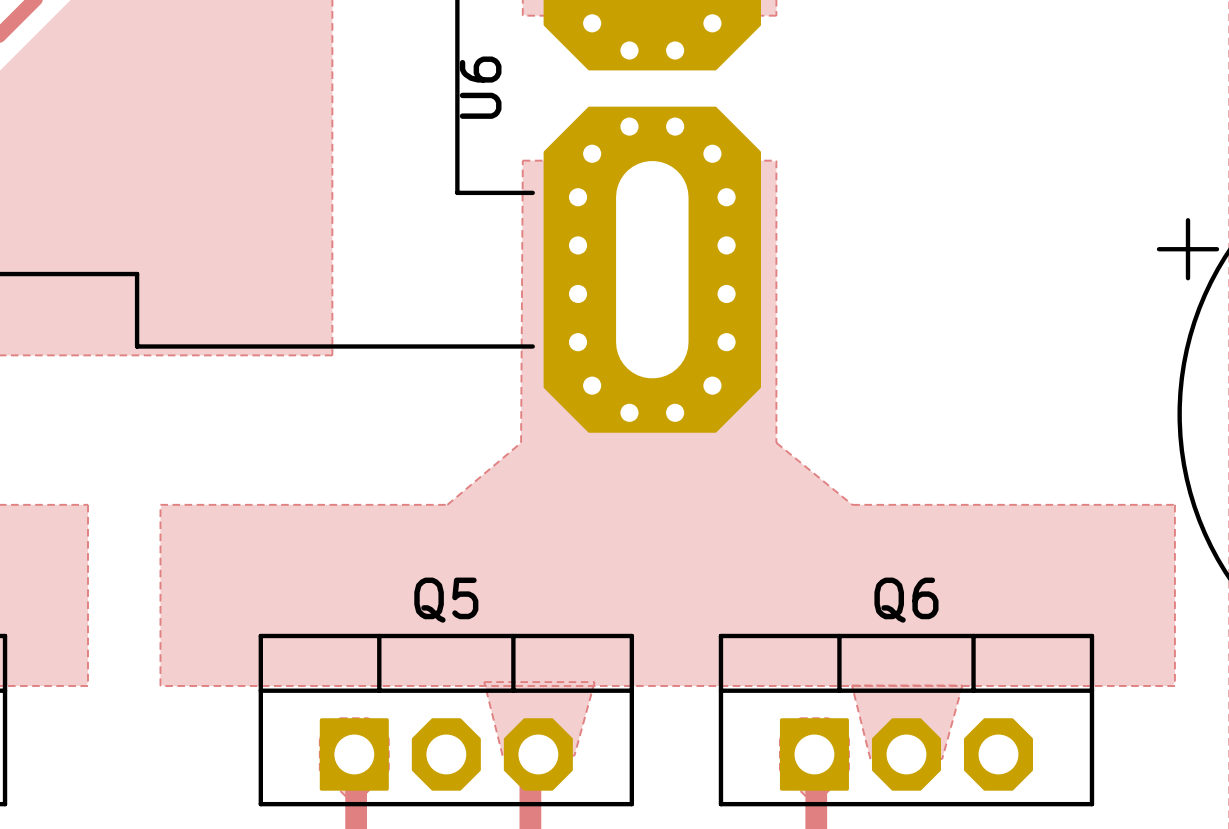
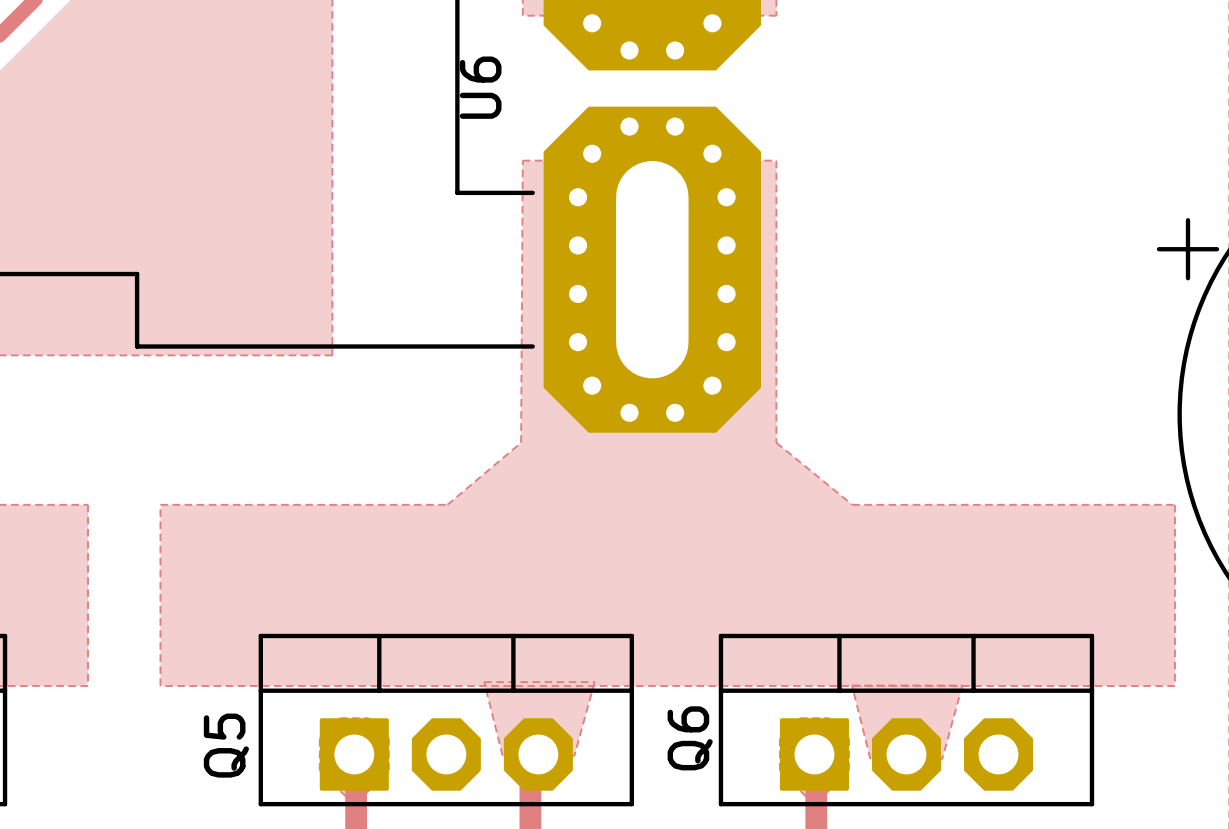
Q5 name rotation: 0° (446, 600) -> 90° counterclockwise (226, 745)
Q5 name position: Q5 (446, 600) -> Q5 (226, 745)
Q6 name rotation: 0° (906, 600) -> 90° counterclockwise (690, 738)
Q6 name position: Q6 (906, 600) -> Q6 (690, 738)

